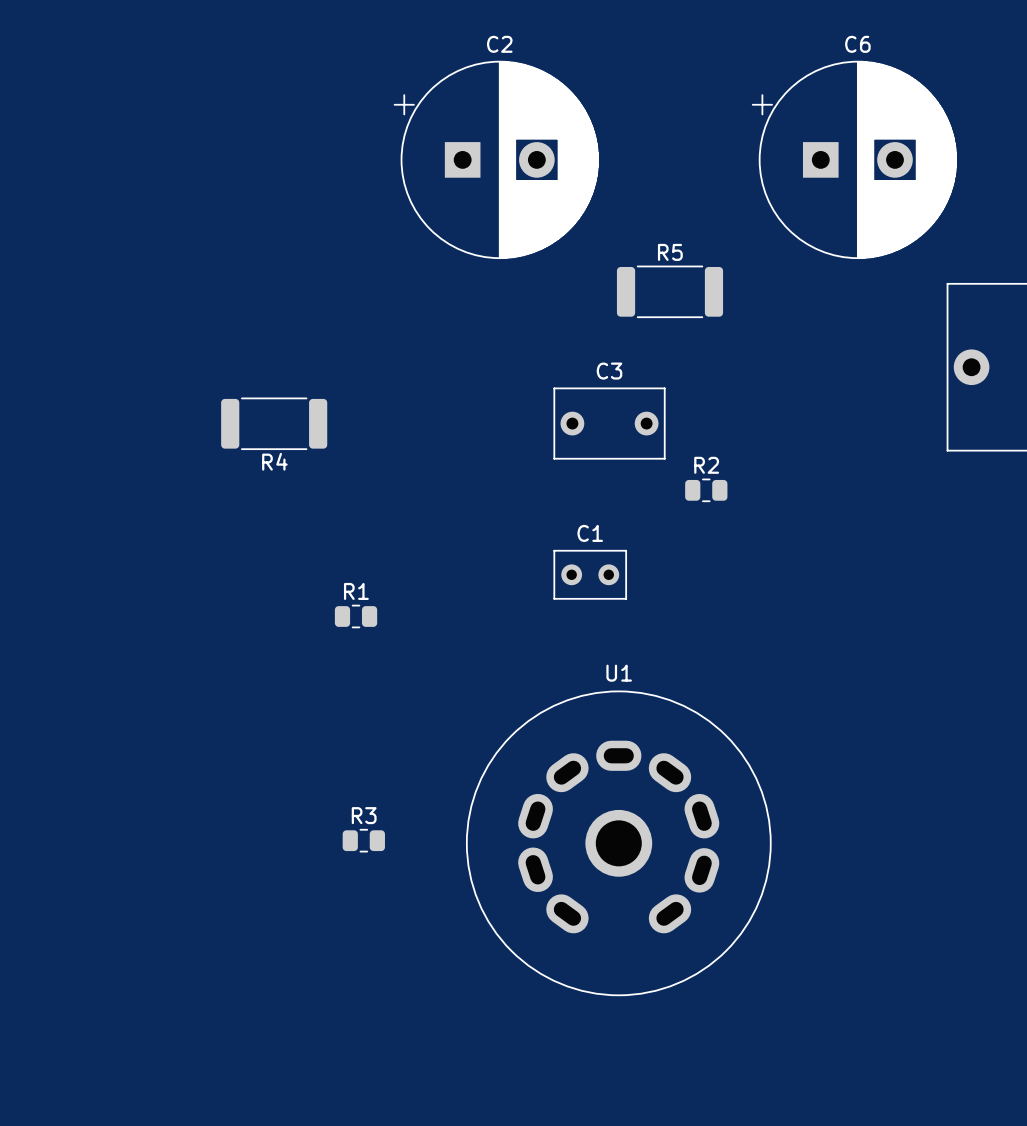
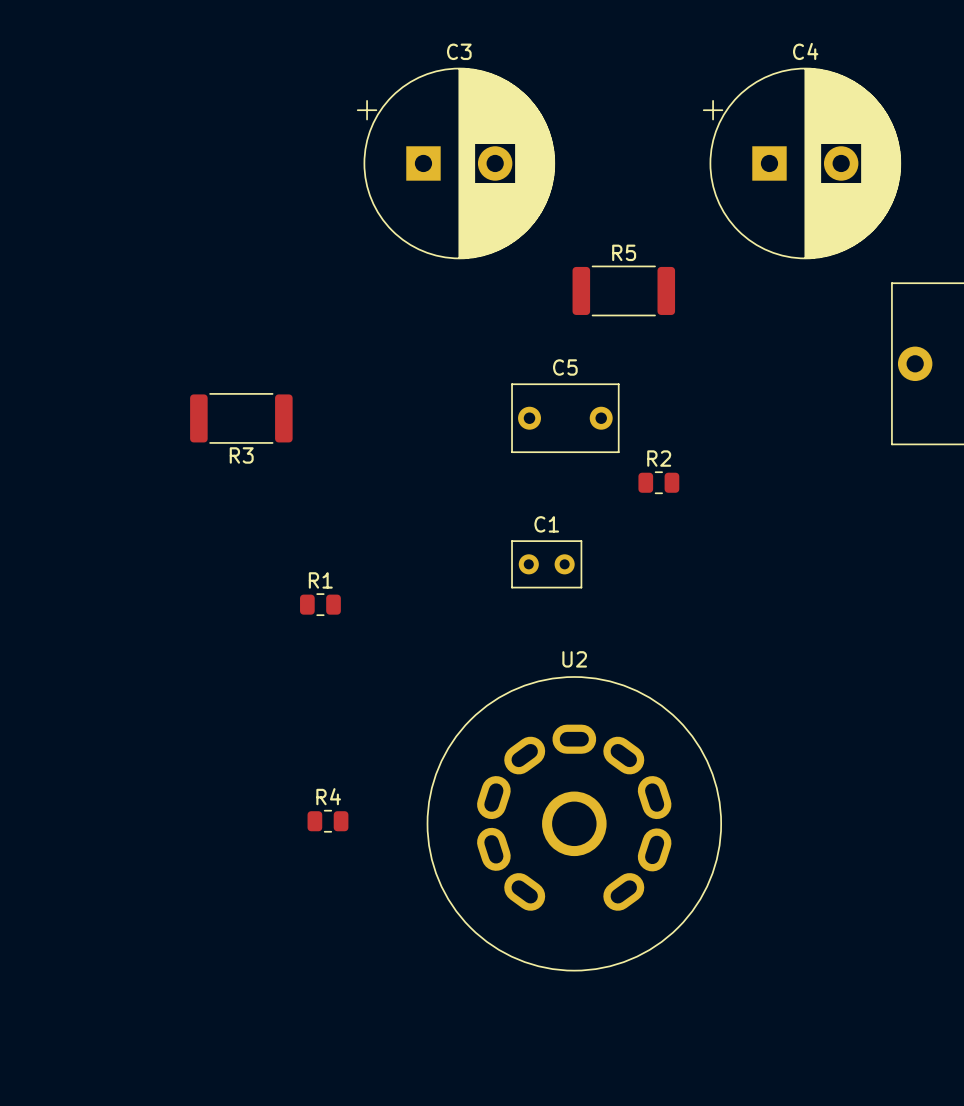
C2 name: C2 (499, 44) -> C3 (459, 51)
C6 name: C6 (857, 44) -> C4 (805, 51)
C3 name: C3 (609, 371) -> C5 (565, 367)
R4 name: R4 (274, 461) -> R3 (241, 455)
U1 name: U1 (619, 673) -> U2 (574, 659)
R3 name: R3 (364, 815) -> R4 (328, 796)

